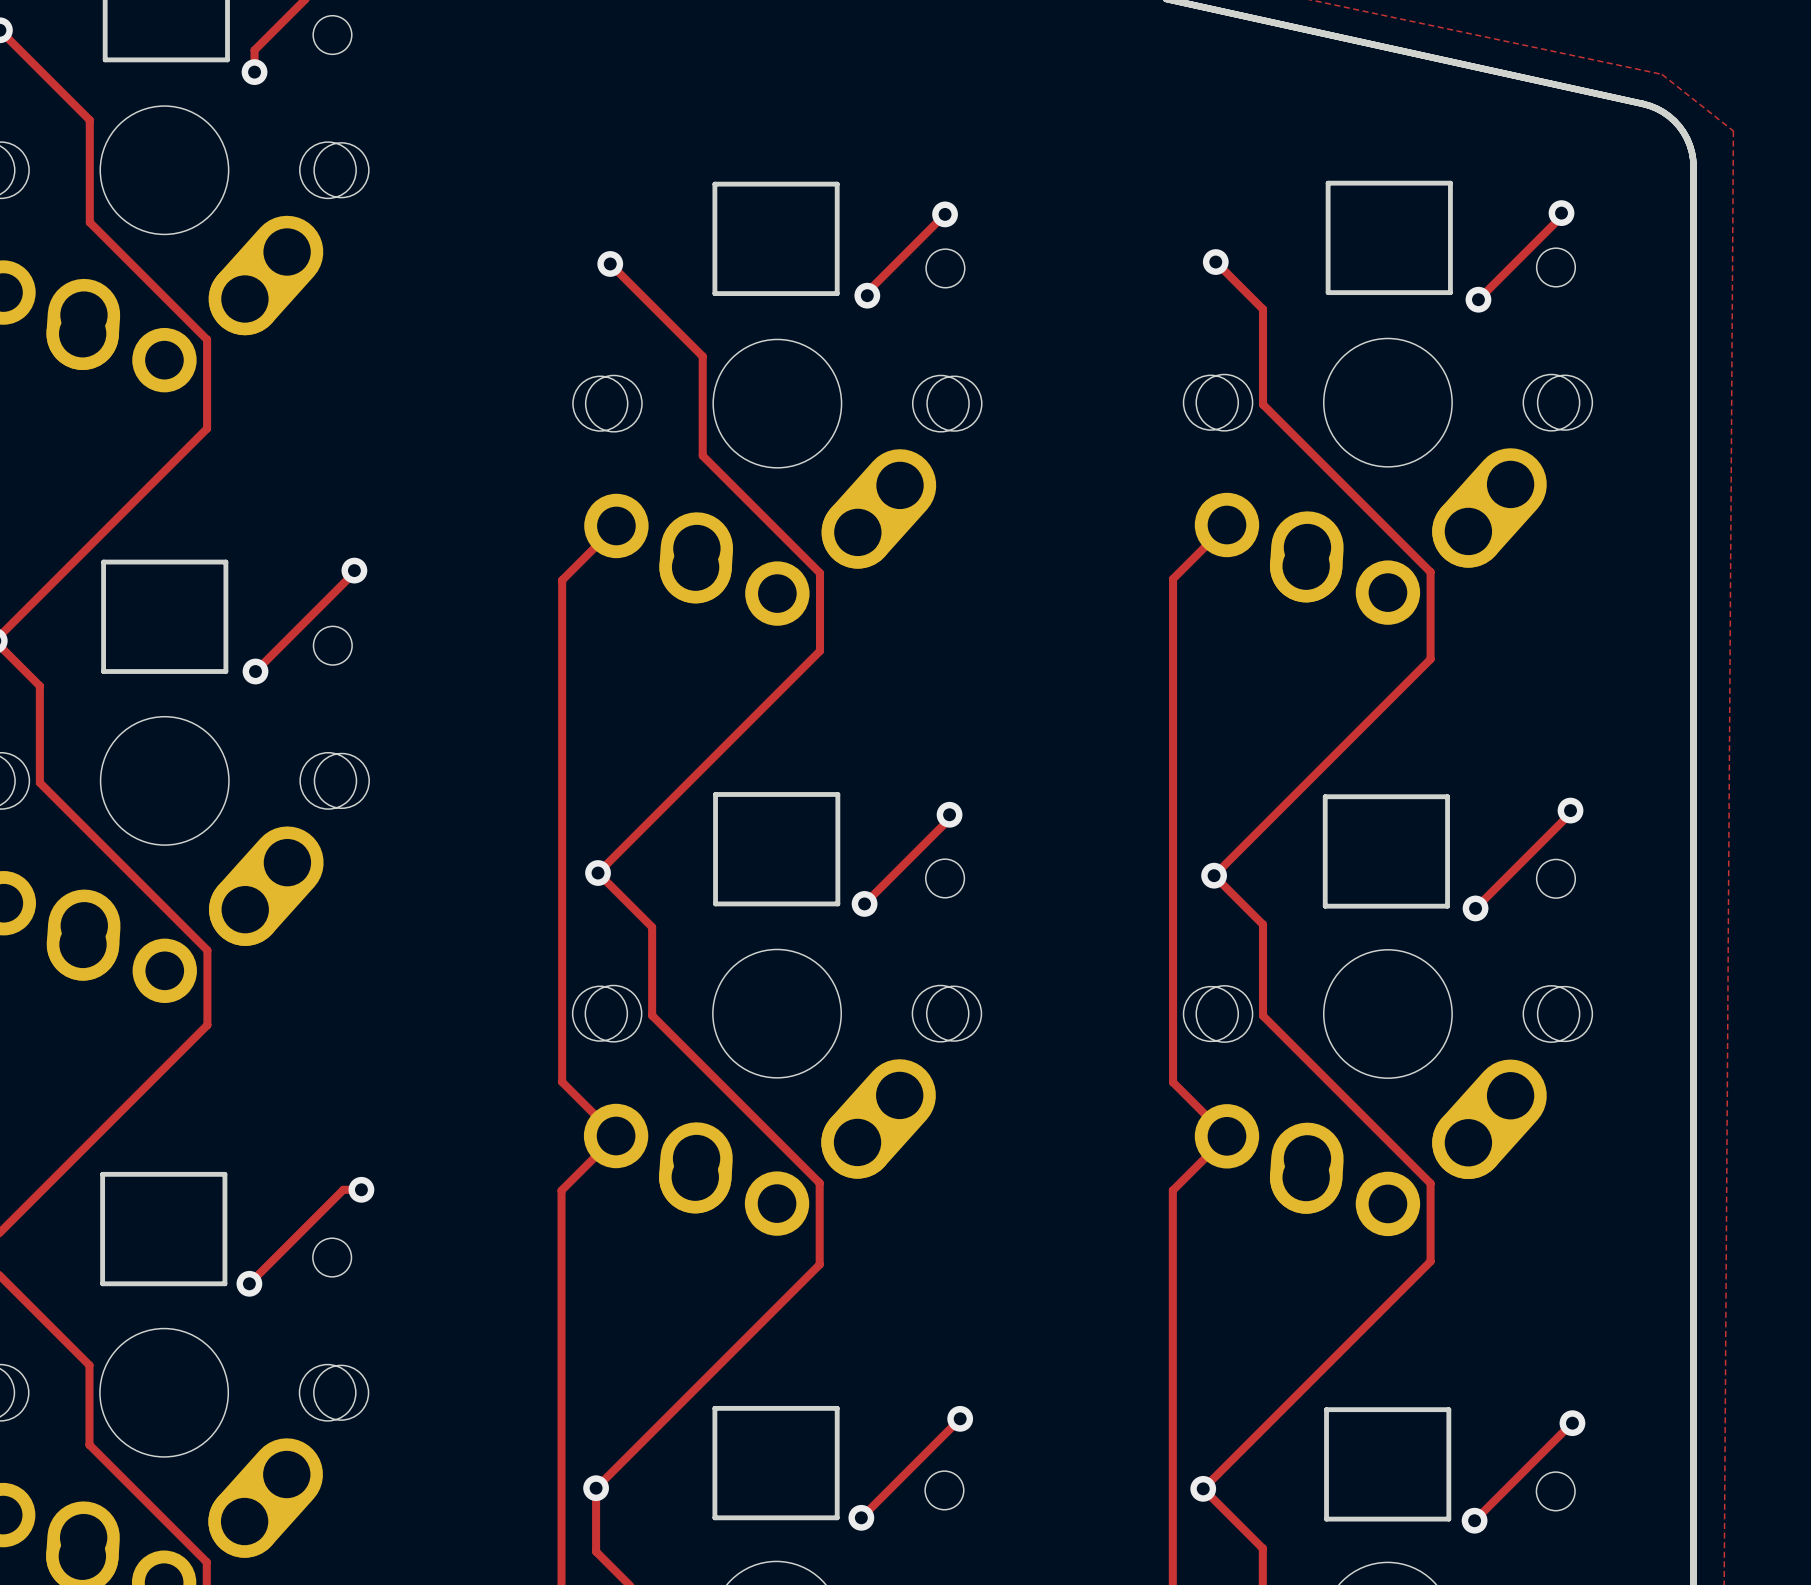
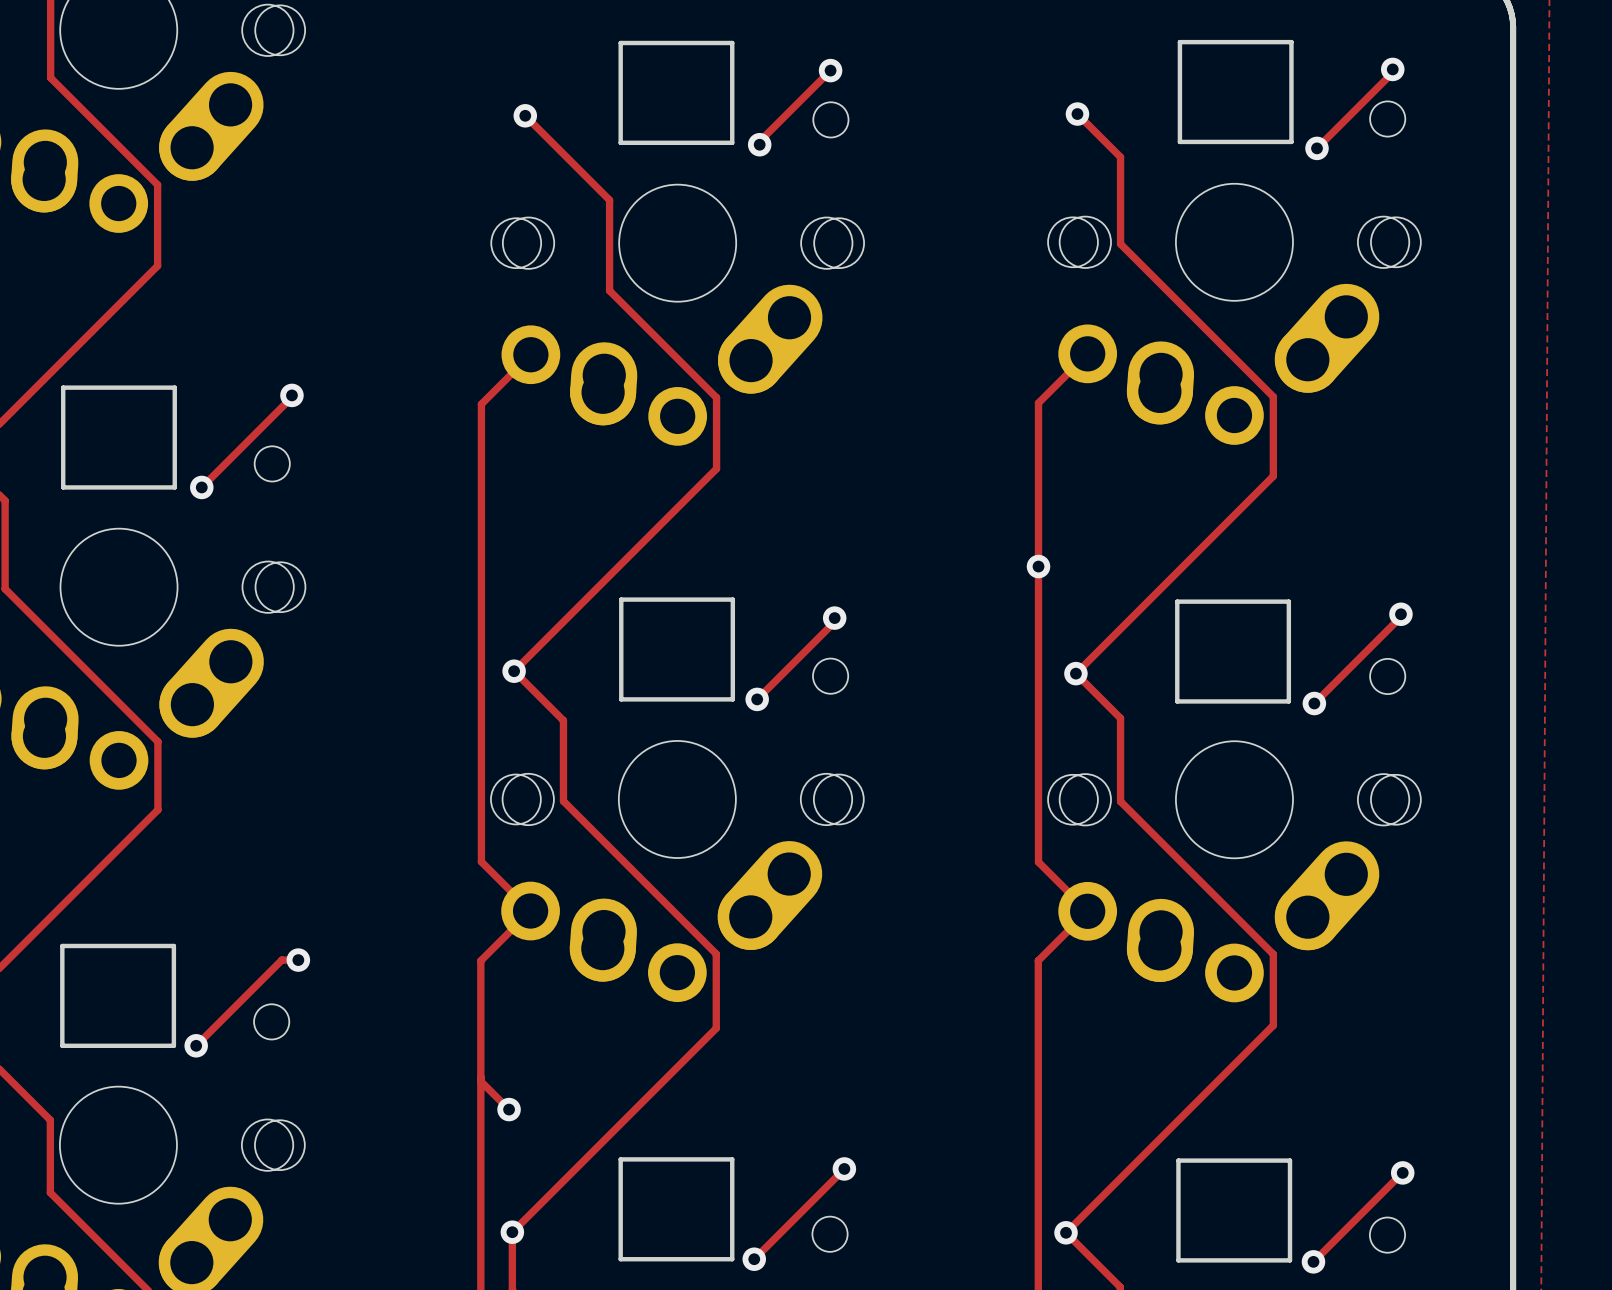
via: none -> (1038, 566)
track: none -> (480, 1081) (509, 1109)
via: none -> (509, 1109)

